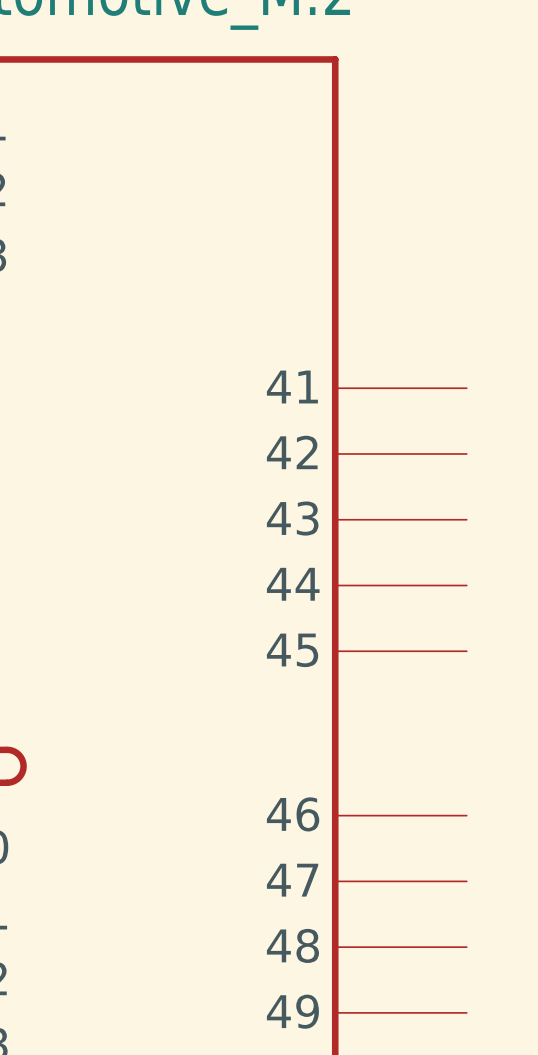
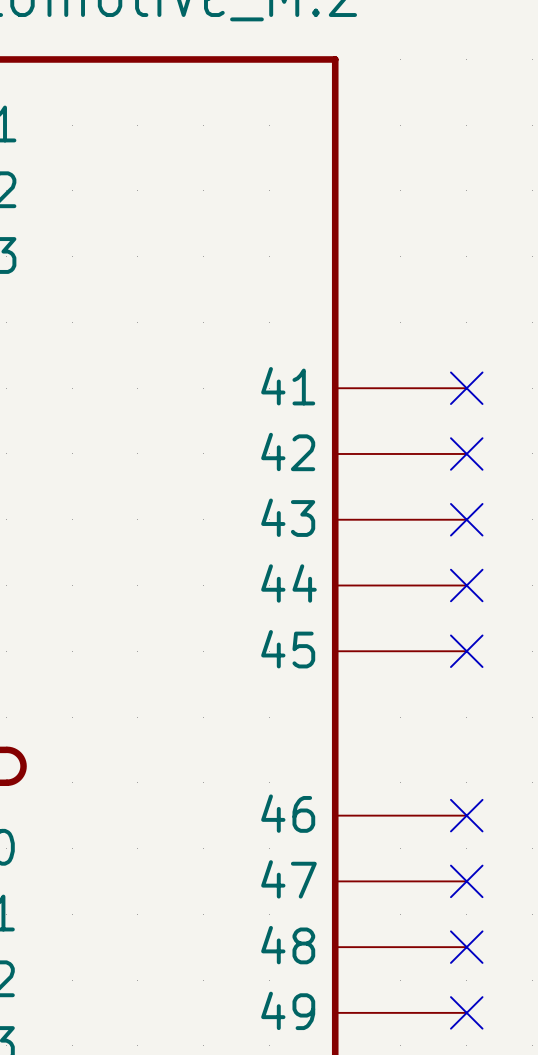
no-connect mark: none -> (466, 388)
no-connect mark: none -> (466, 453)
no-connect mark: none -> (466, 519)
no-connect mark: none -> (466, 585)
no-connect mark: none -> (466, 651)
no-connect mark: none -> (466, 815)
no-connect mark: none -> (466, 881)
no-connect mark: none -> (466, 947)
no-connect mark: none -> (466, 1012)

